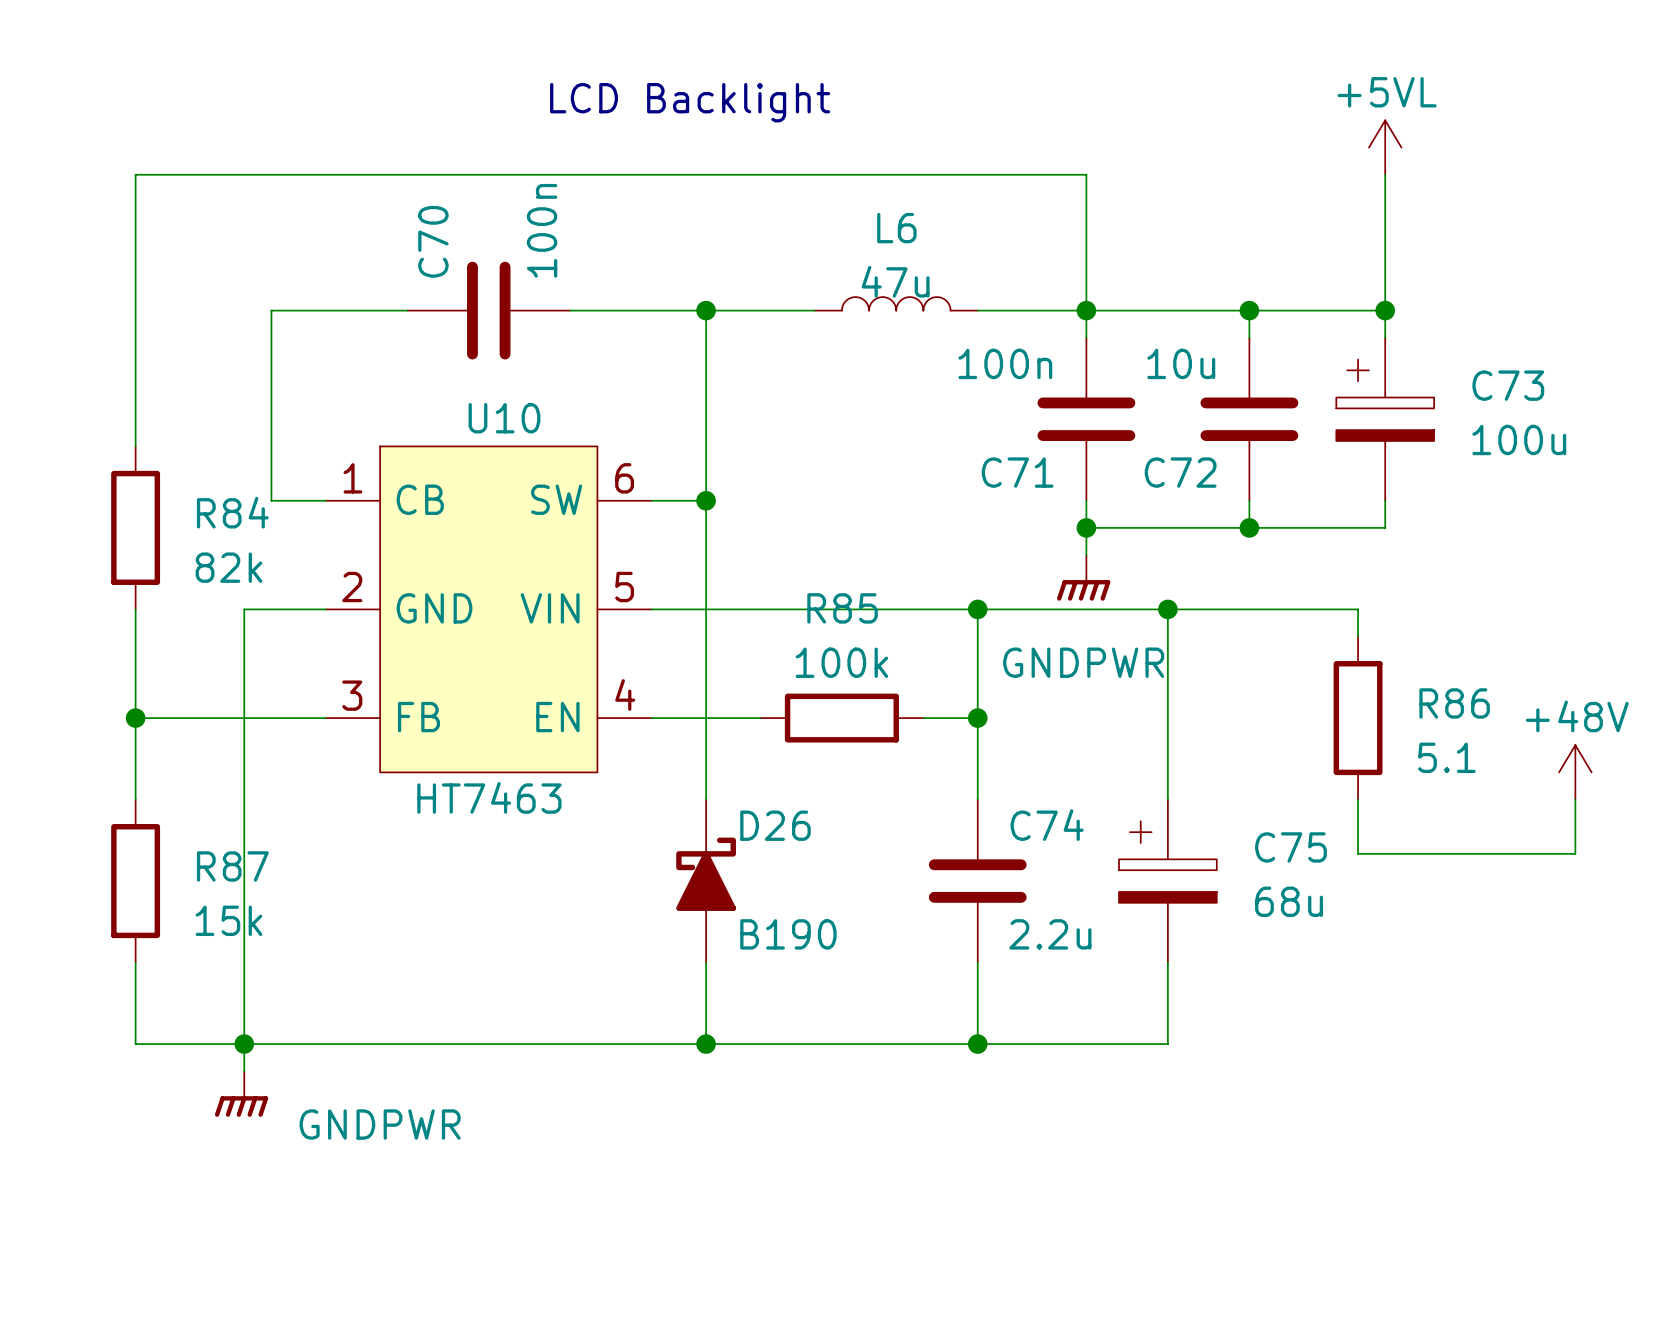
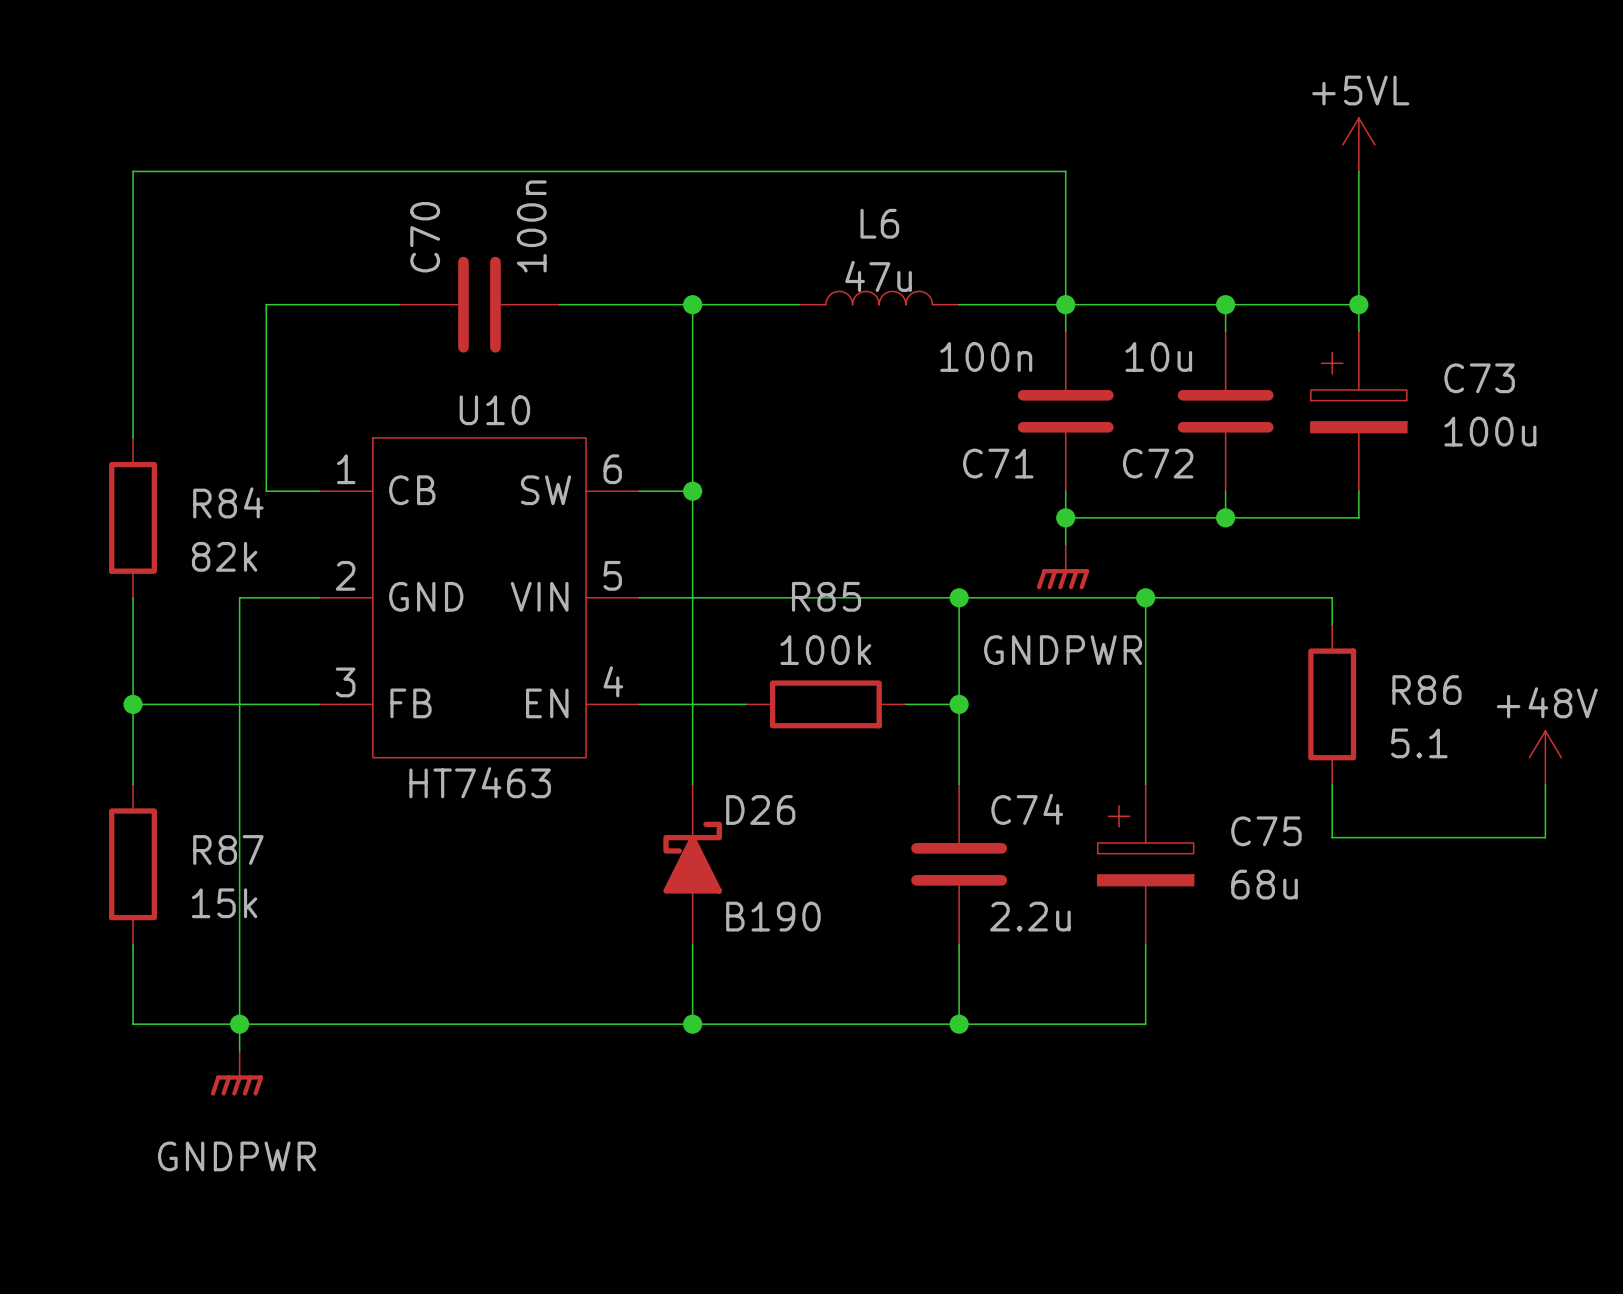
text: LCD Backlight (690, 102) -> none
power symbol text position: GNDPWR (380, 1124) -> GNDPWR (236, 1156)

